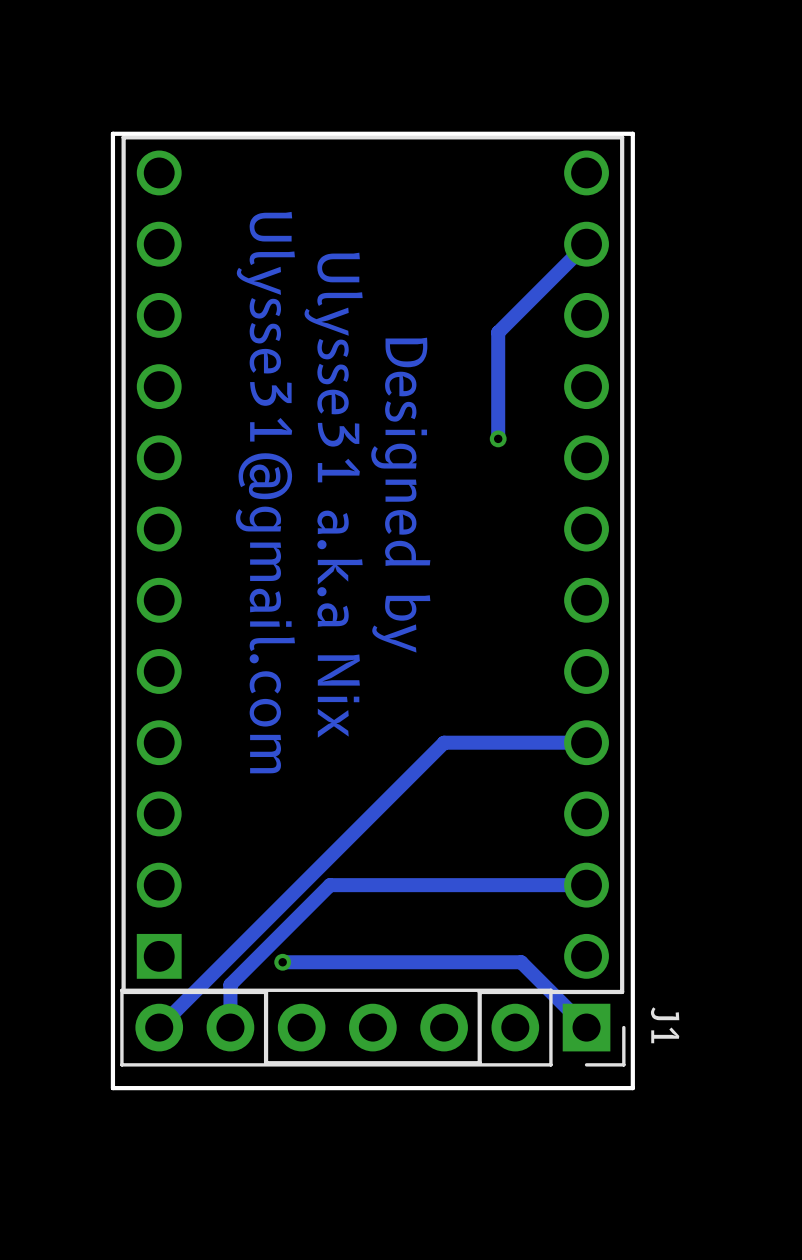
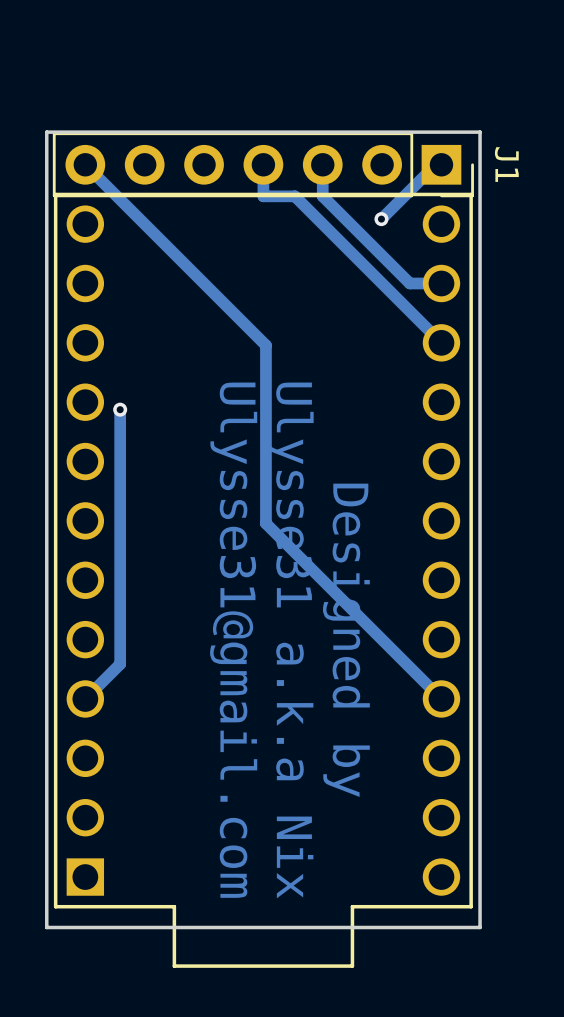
track: none -> (85, 164) (265, 345) (265, 523) (441, 698)
track: none -> (263, 164) (263, 196) (294, 196) (441, 342)
track: none -> (322, 164) (322, 196) (409, 283) (441, 283)
track: none -> (441, 164) (435, 164) (381, 219)
via: none -> (381, 219)
track: (586, 244) (498, 332) (498, 438) -> none
via: (498, 438) -> none
track: none -> (120, 409) (120, 664) (85, 698)
via: none -> (120, 409)
text position: Ulysse31@gmail.com (265, 492) -> Ulysse31@gmail.com (233, 640)
text position: Ulysse31 a.k.a Nix (333, 495) -> Ulysse31 a.k.a Nix (290, 640)
text position: Designed by (400, 495) -> Designed by (346, 640)
part position: (372, 600) -> (263, 580)
track: (586, 742) (444, 742) (159, 1027) -> none
track: (586, 885) (330, 885) (230, 984) (230, 1027) -> none
track: (282, 962) (521, 962) (586, 1027) -> none
via: (282, 962) -> none
J1 position: (372, 1027) -> (263, 164)

